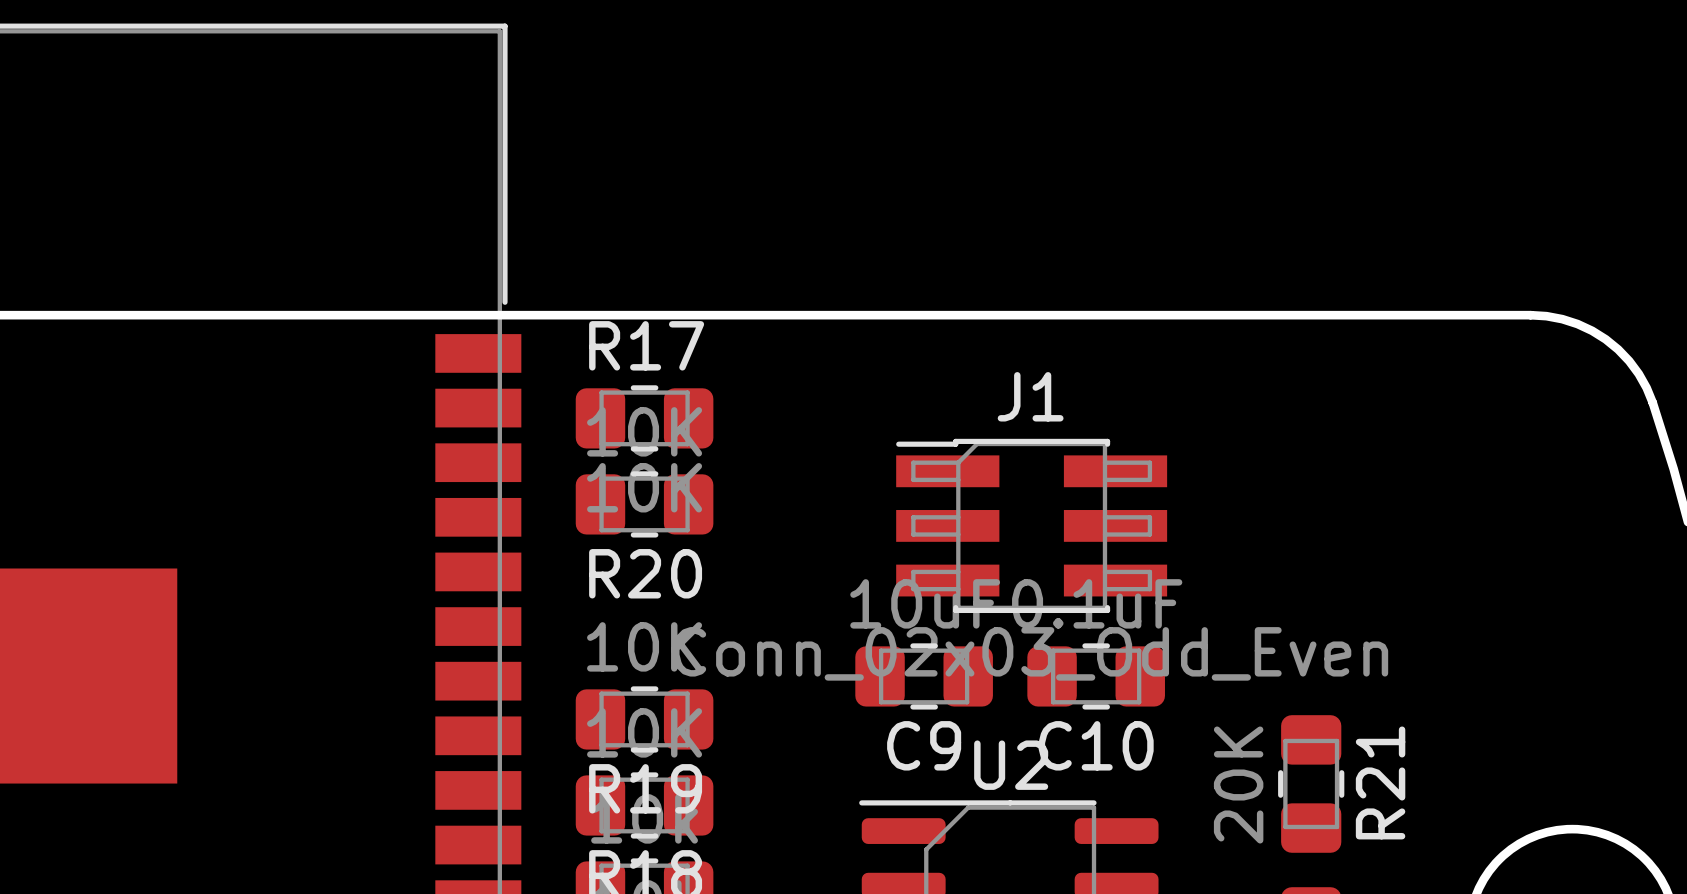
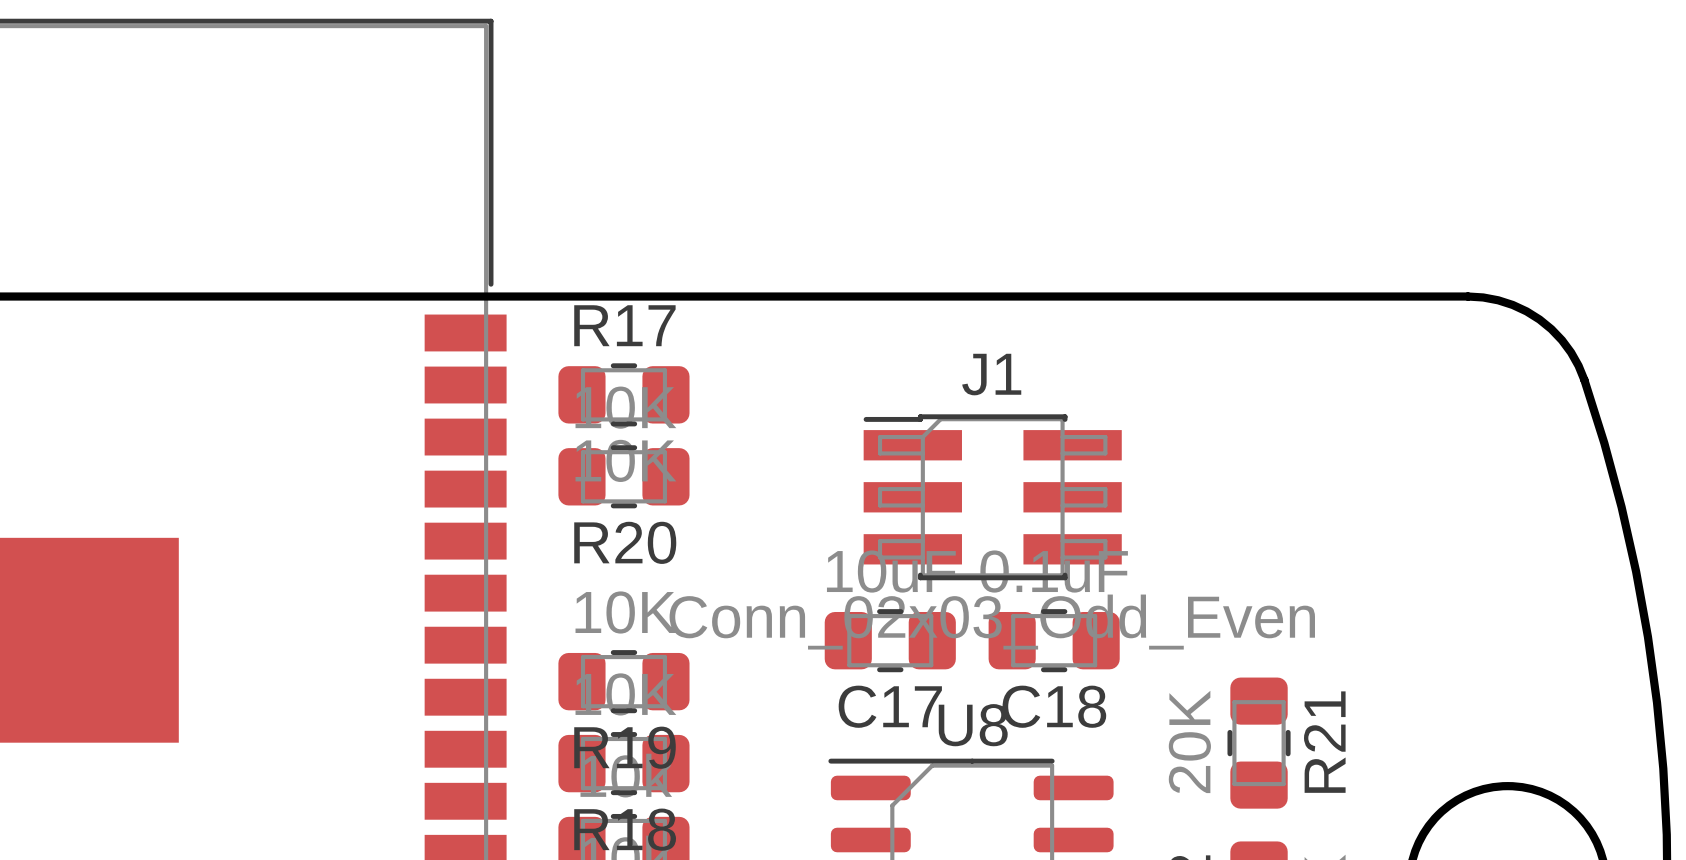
C9 name: C9 (924, 745) -> C17 (890, 706)
C10 name: C10 (1096, 745) -> C18 (1054, 706)
U2 name: U2 (1011, 765) -> U8 (973, 725)

